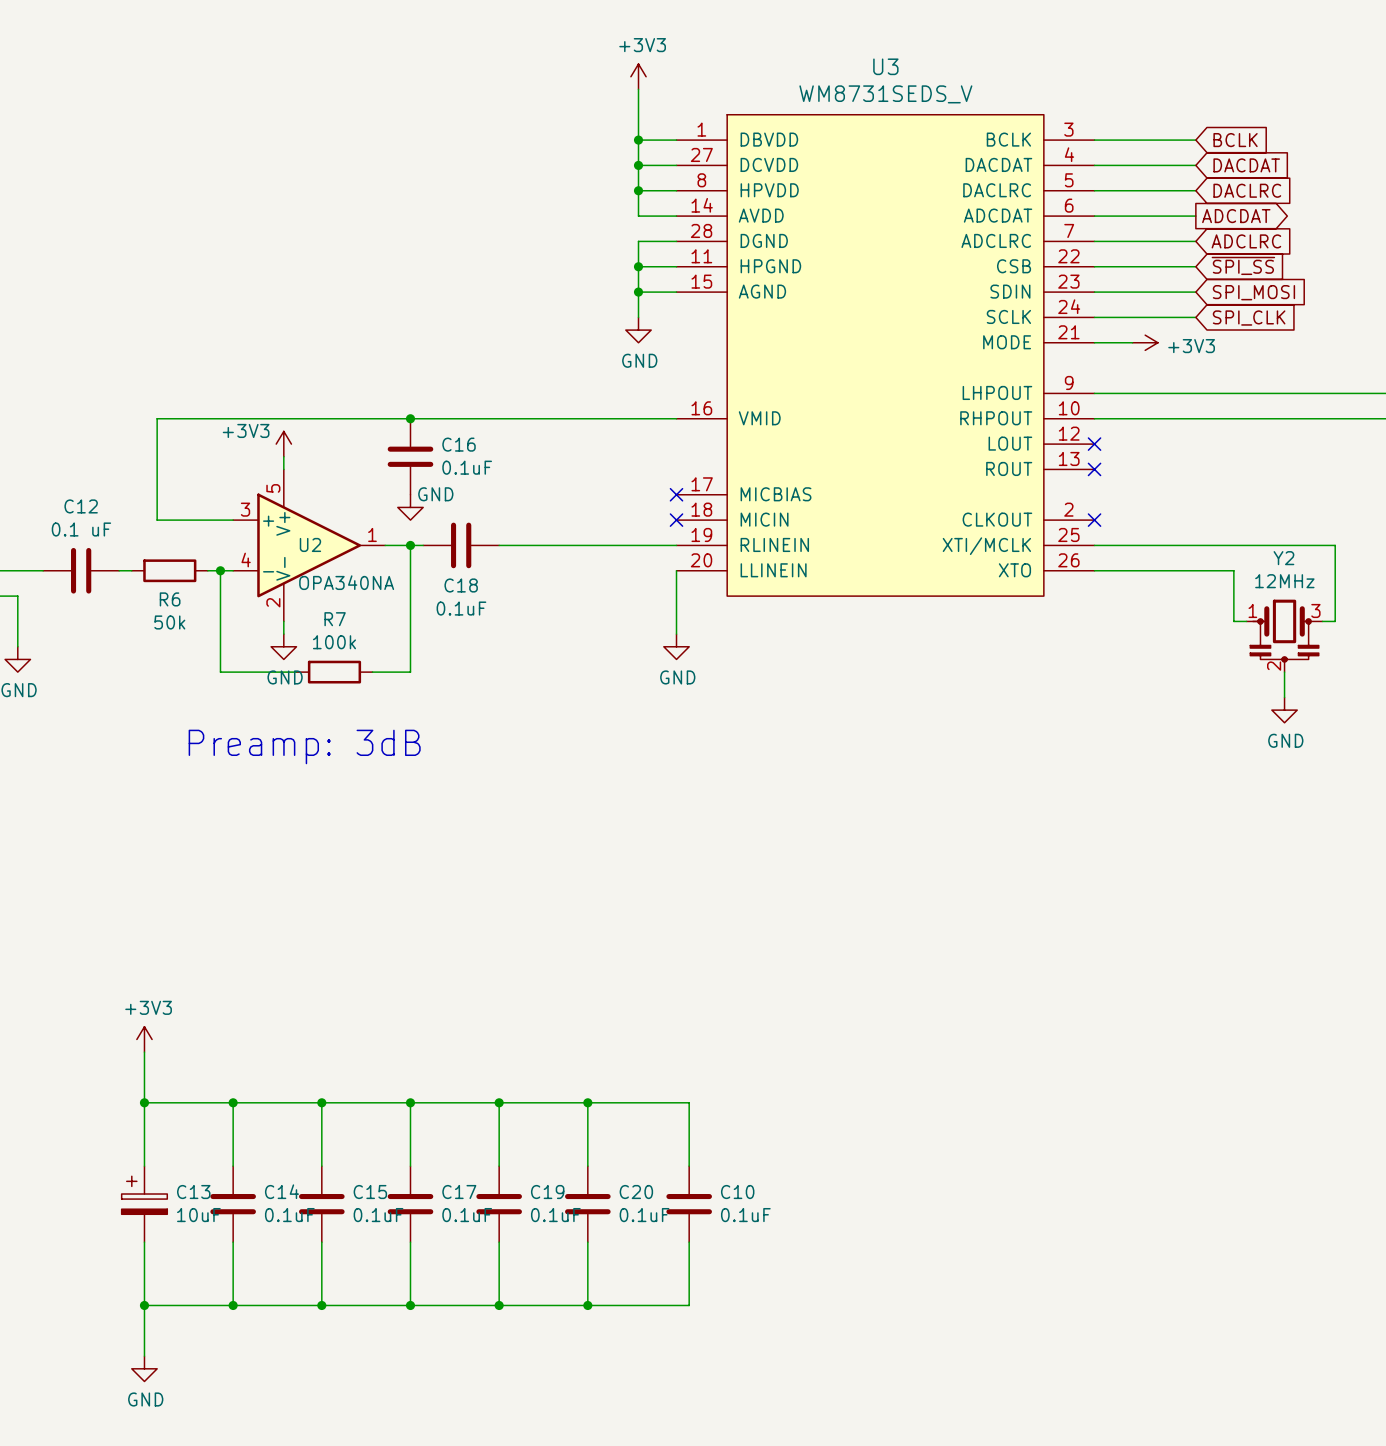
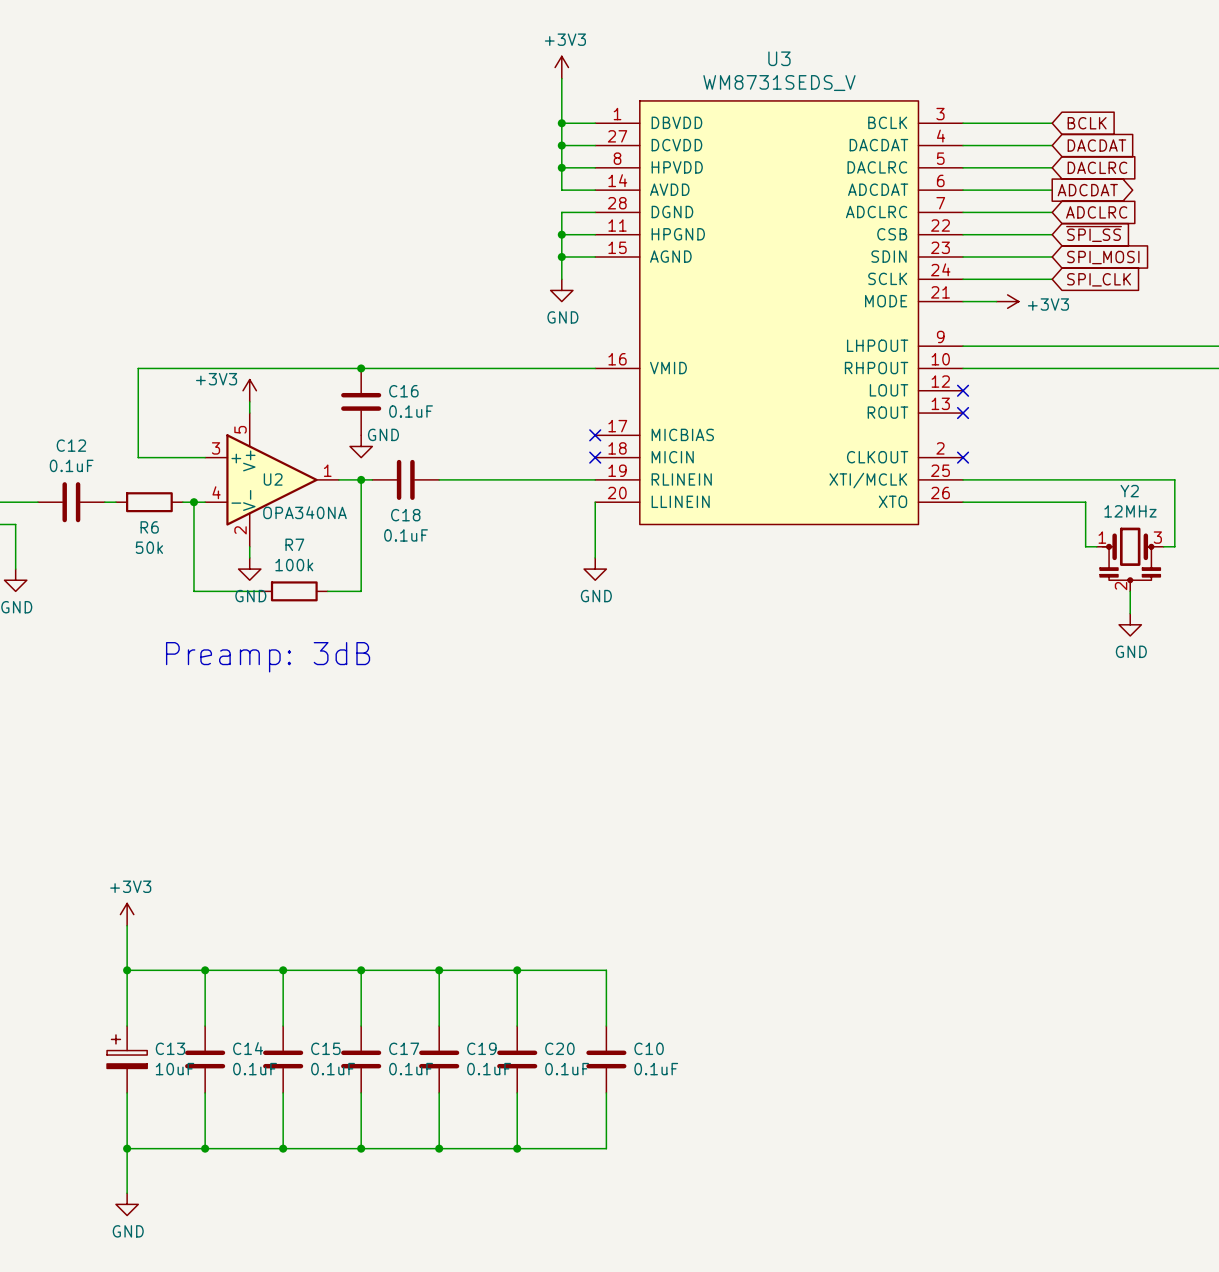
C12 value: 0.1 uF (81, 529) -> 0.1uF (71, 465)

